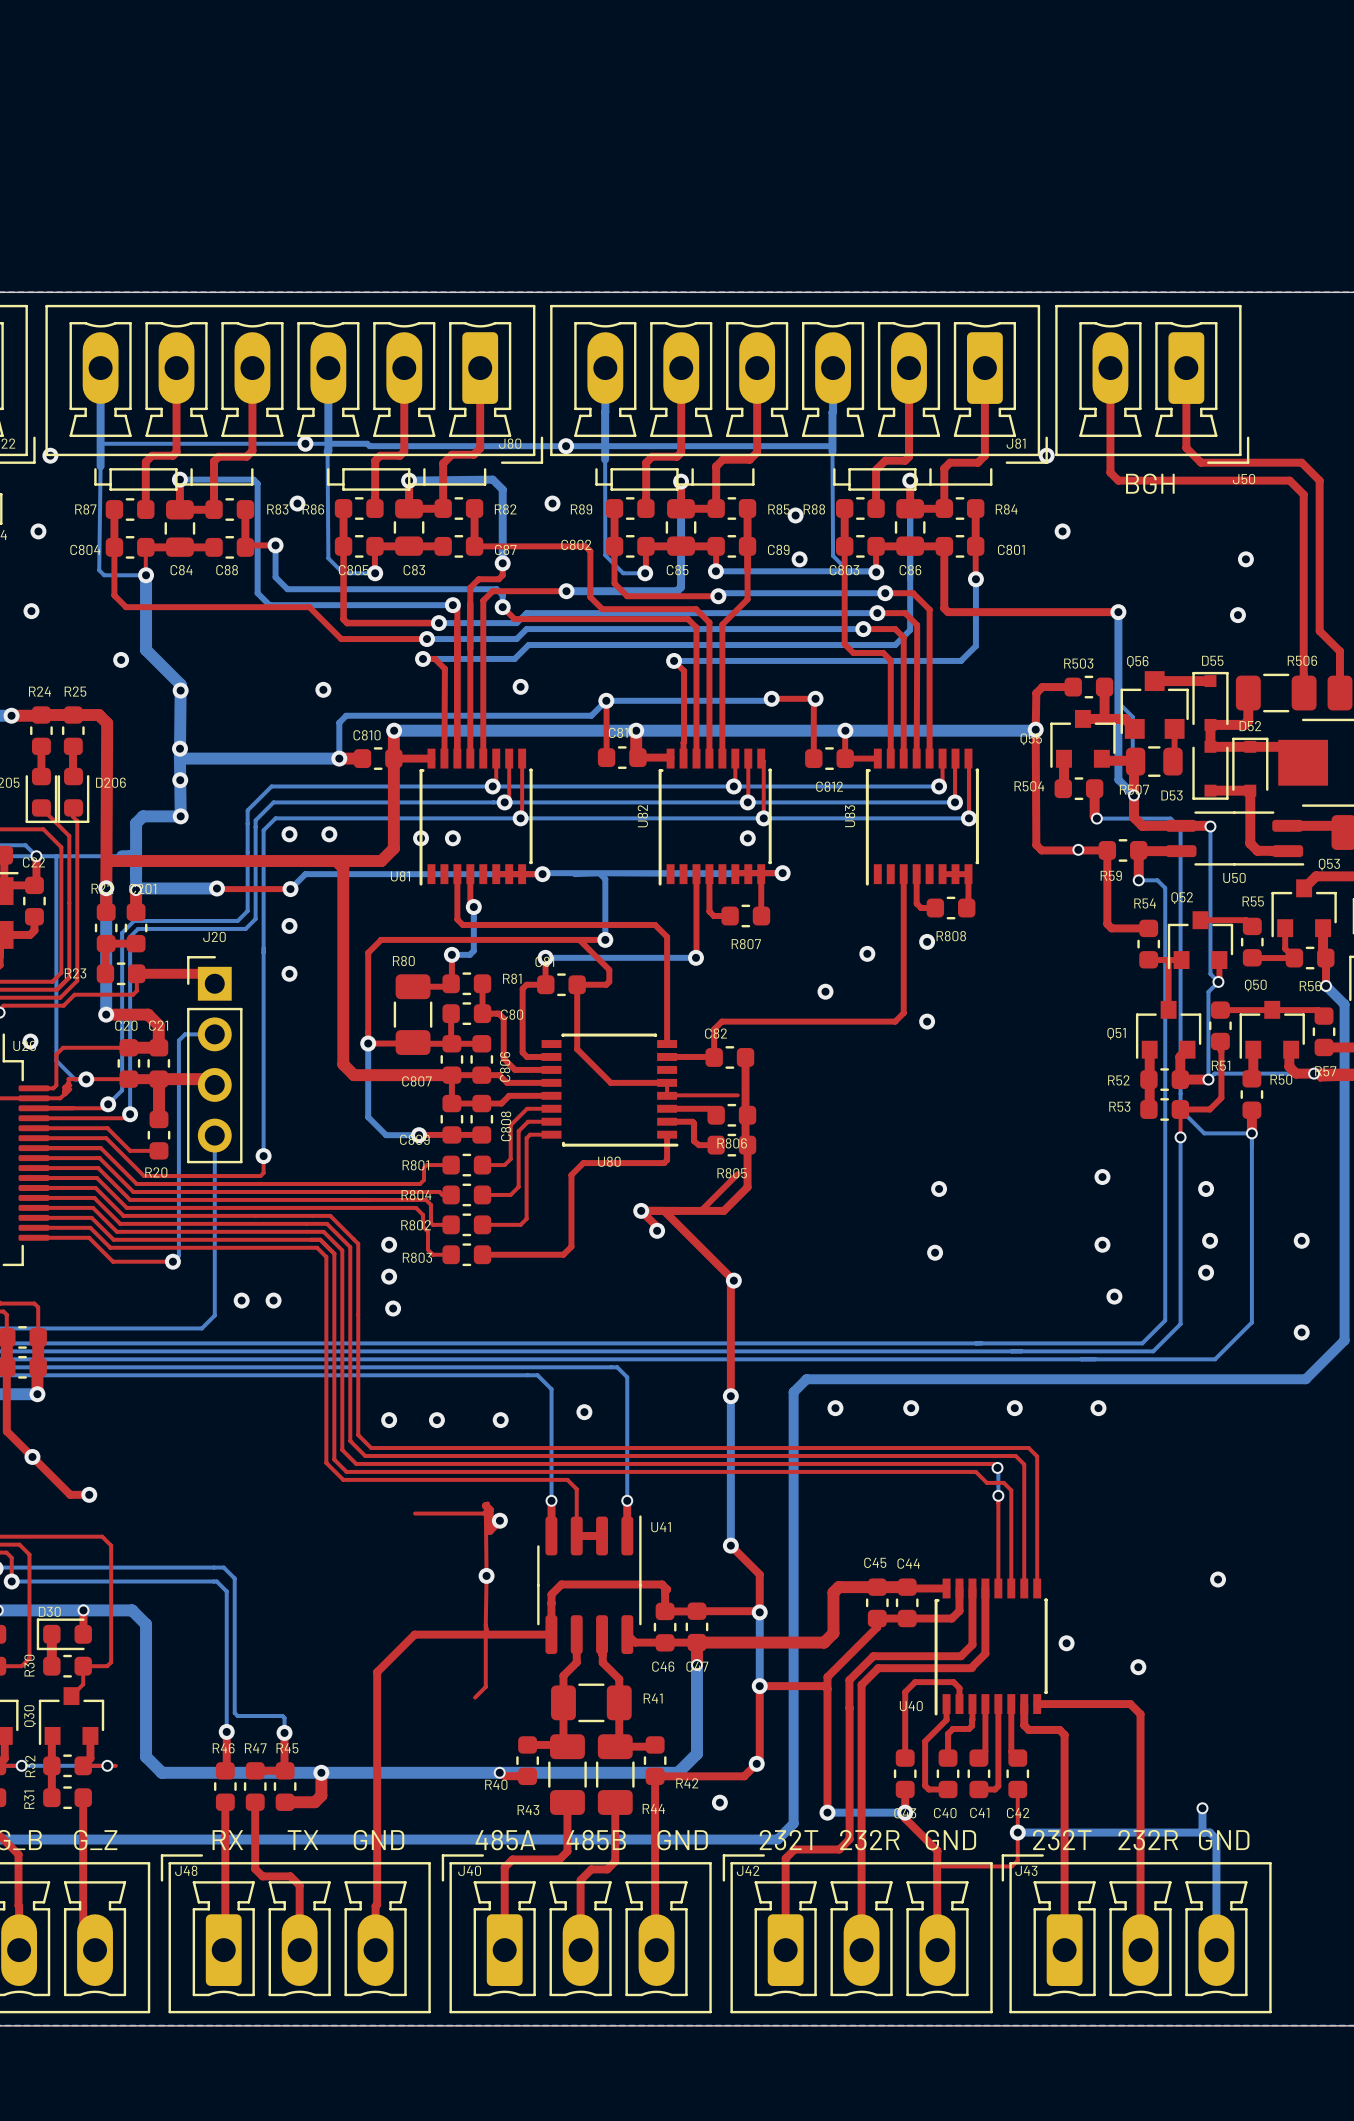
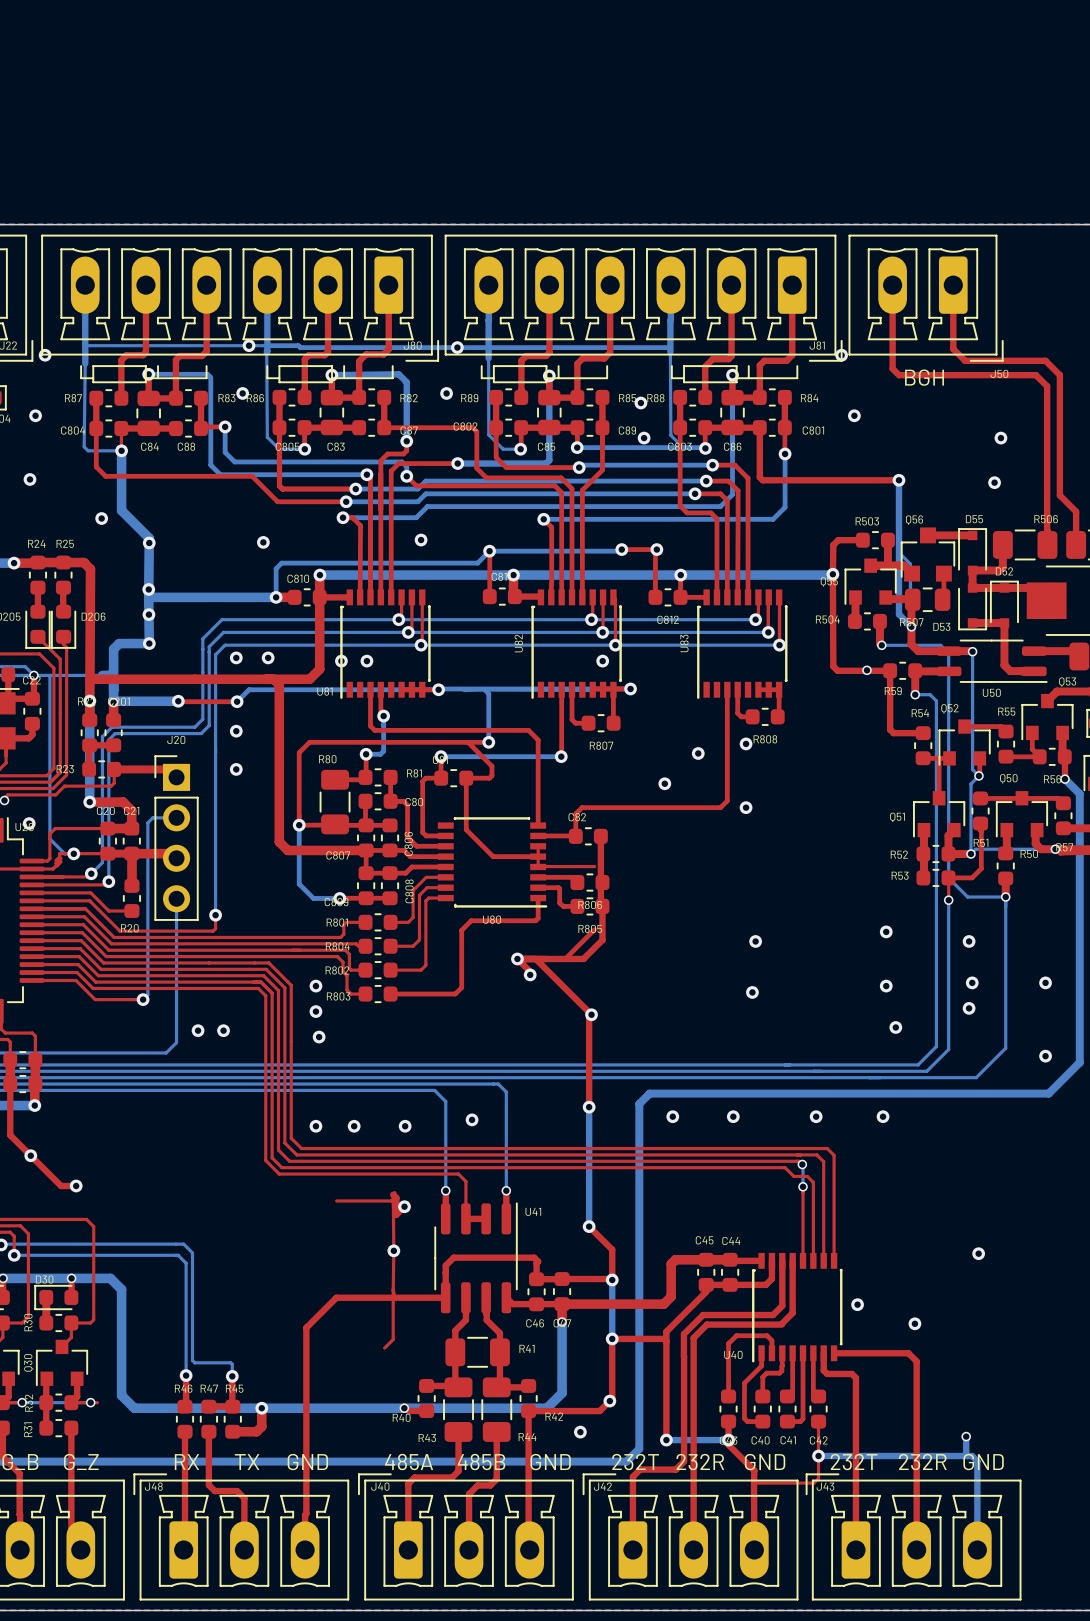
top track: none -> (538, 846) (538, 856)

